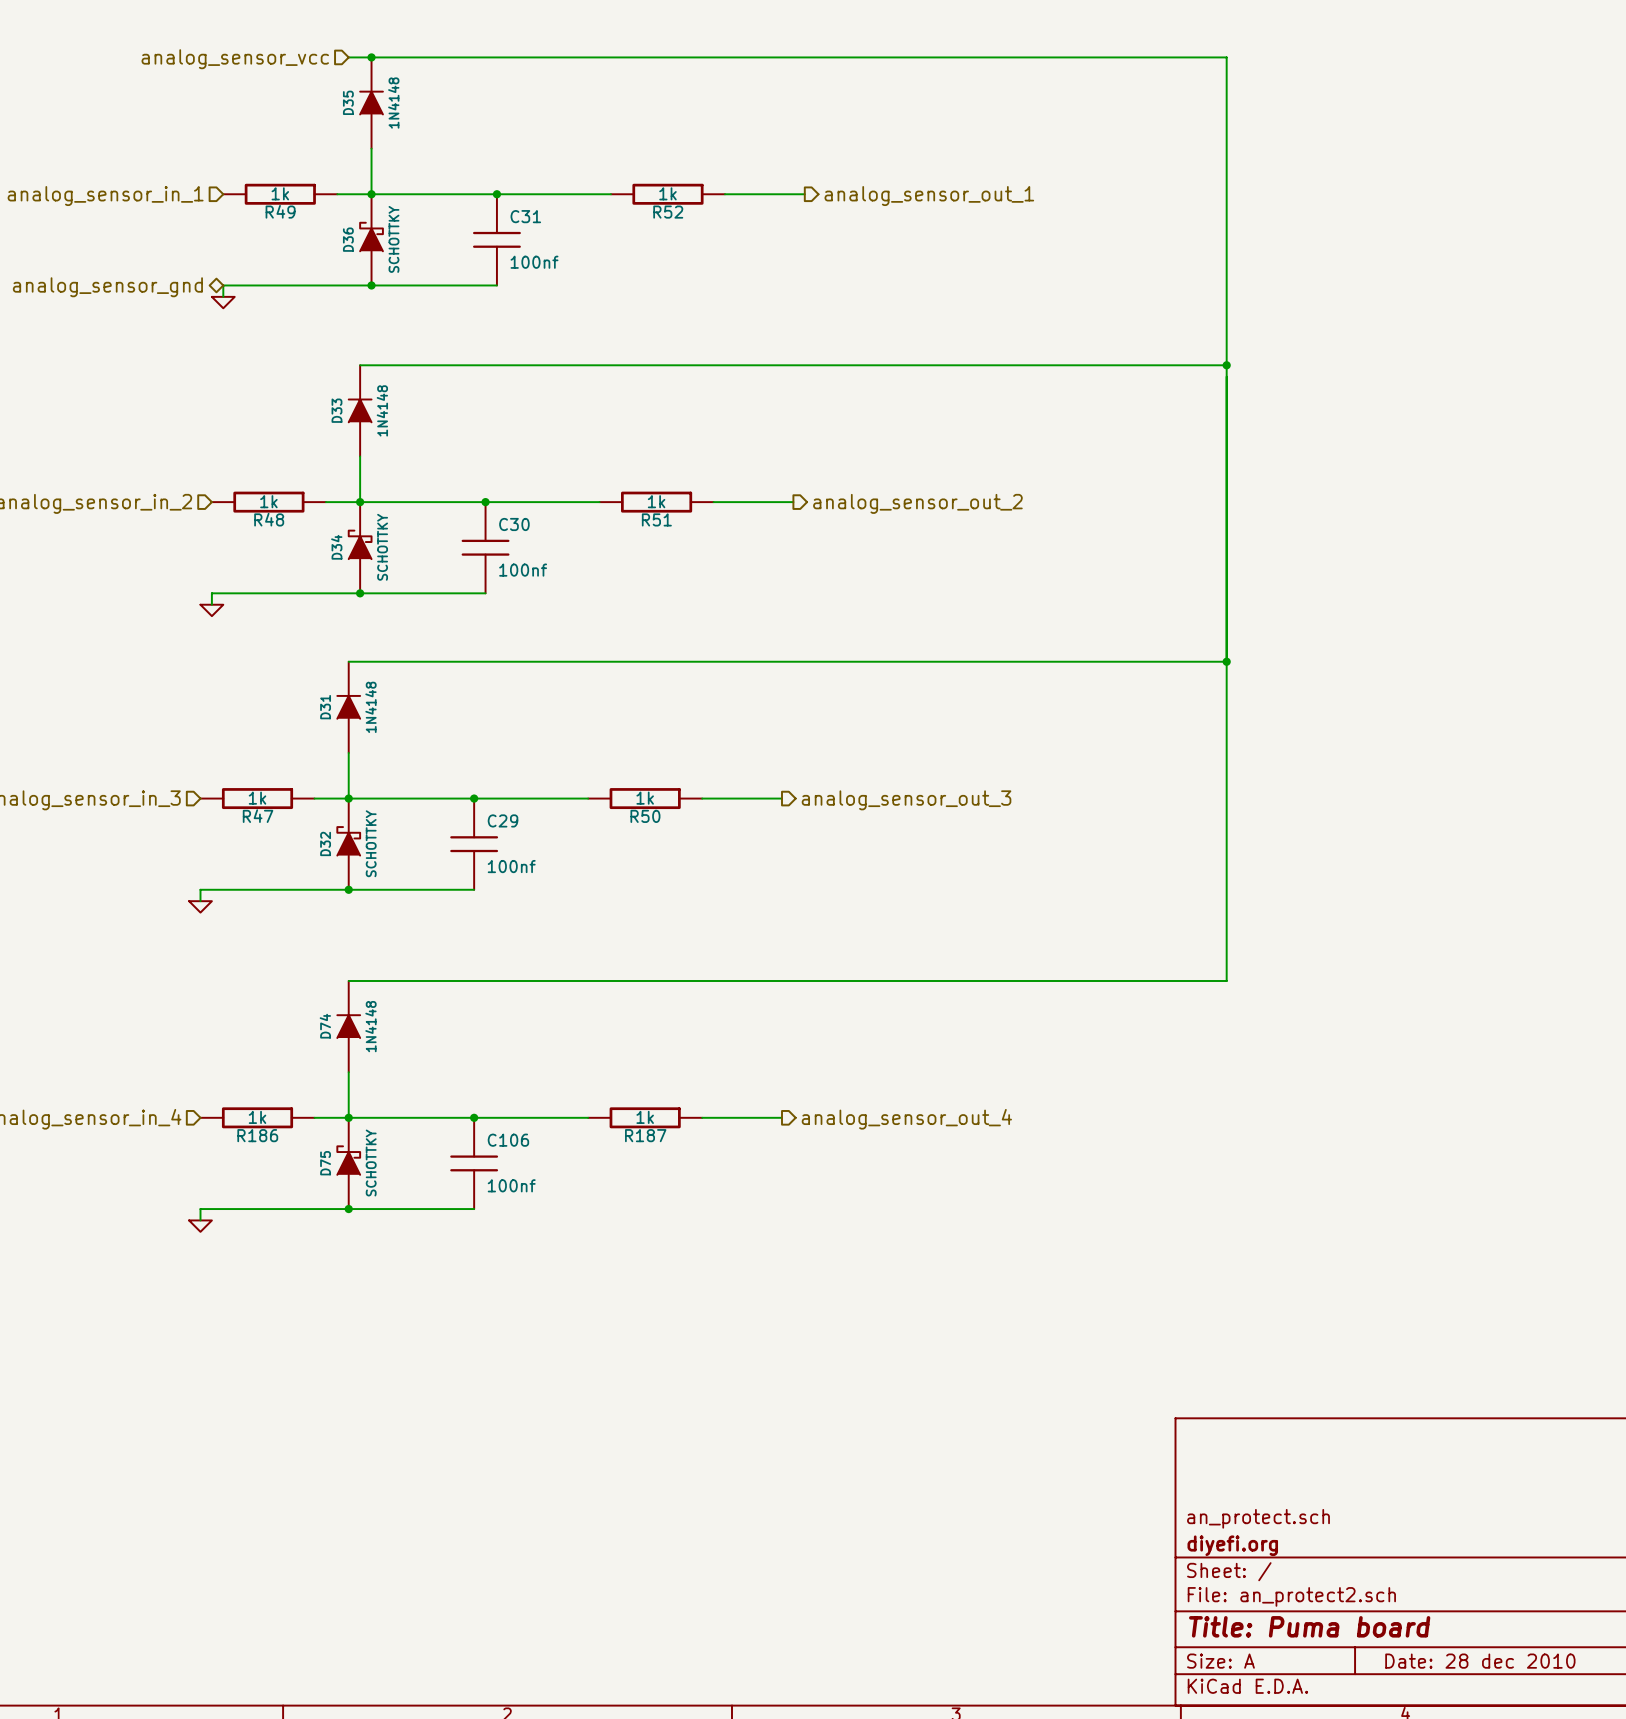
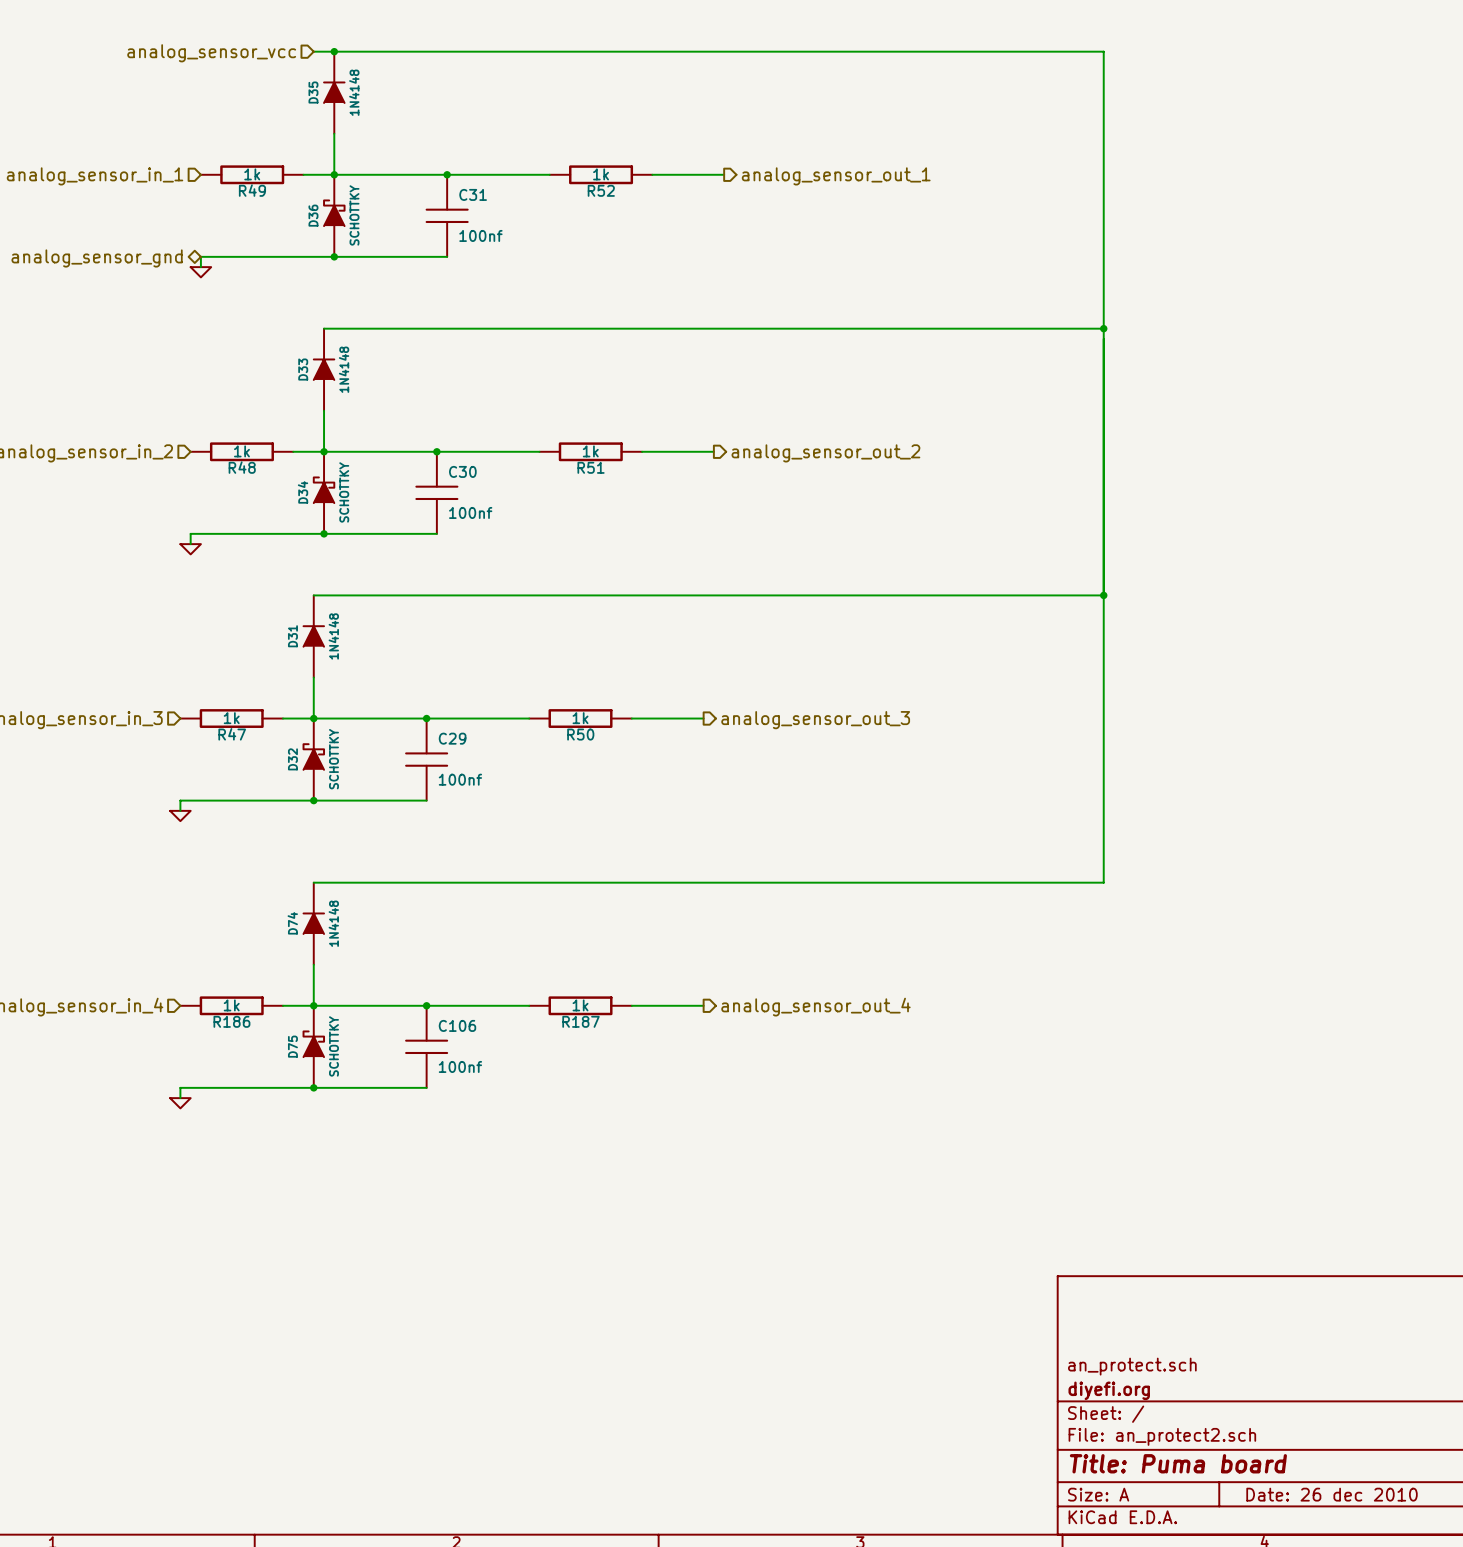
title block: Date: 28 dec 2010 (1480, 1661) -> Date: 26 dec 2010 (1332, 1494)

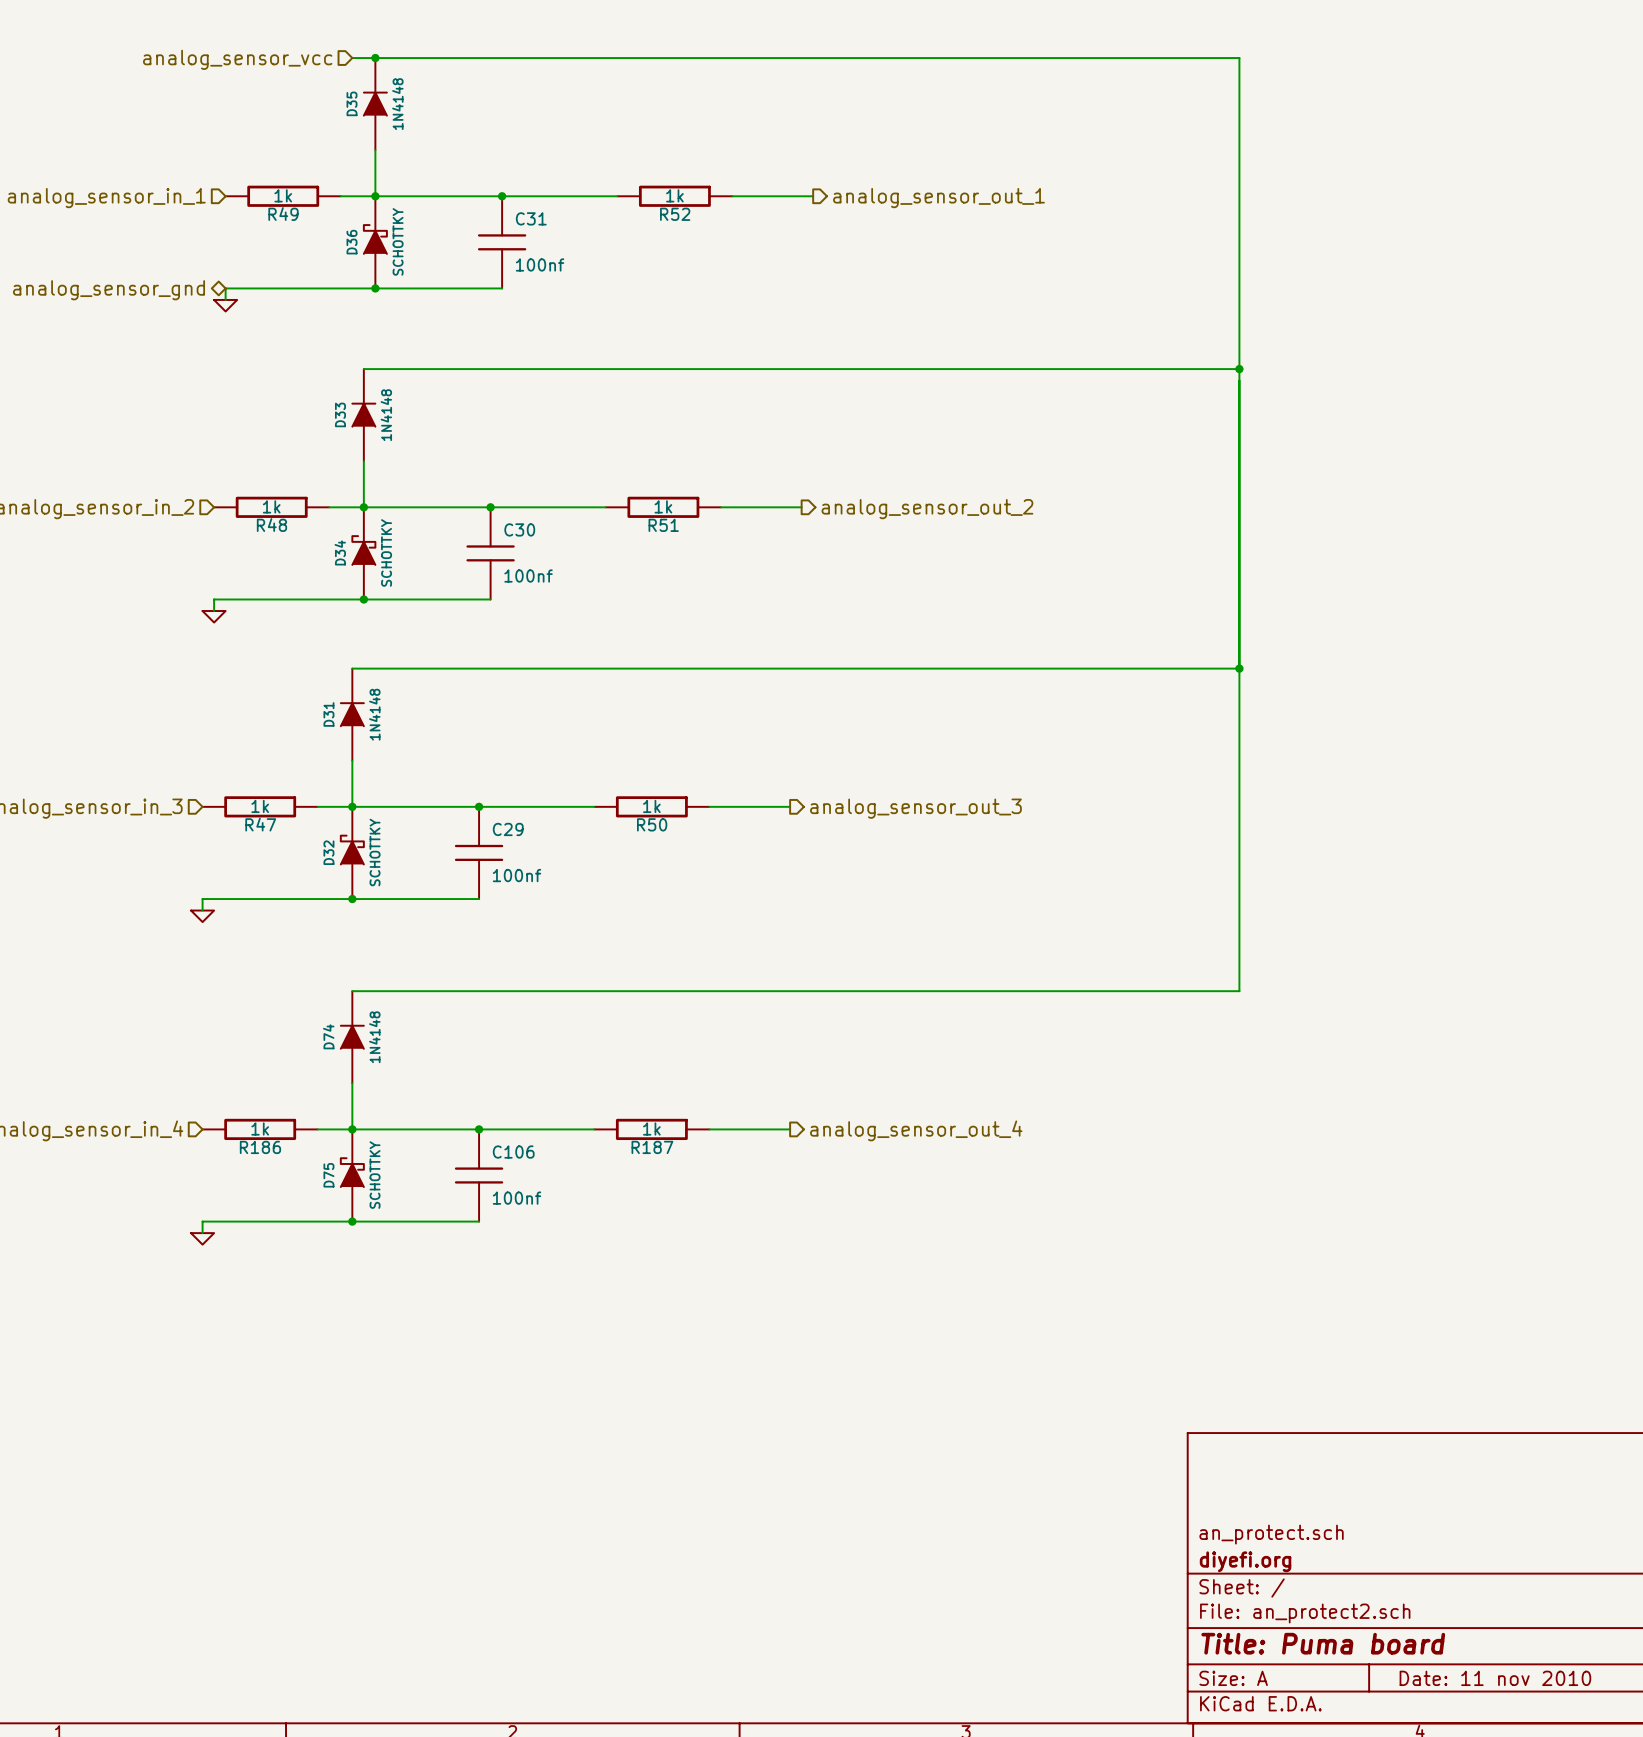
title block: Date: 26 dec 2010 (1332, 1494) -> Date: 11 nov 2010 (1495, 1678)

